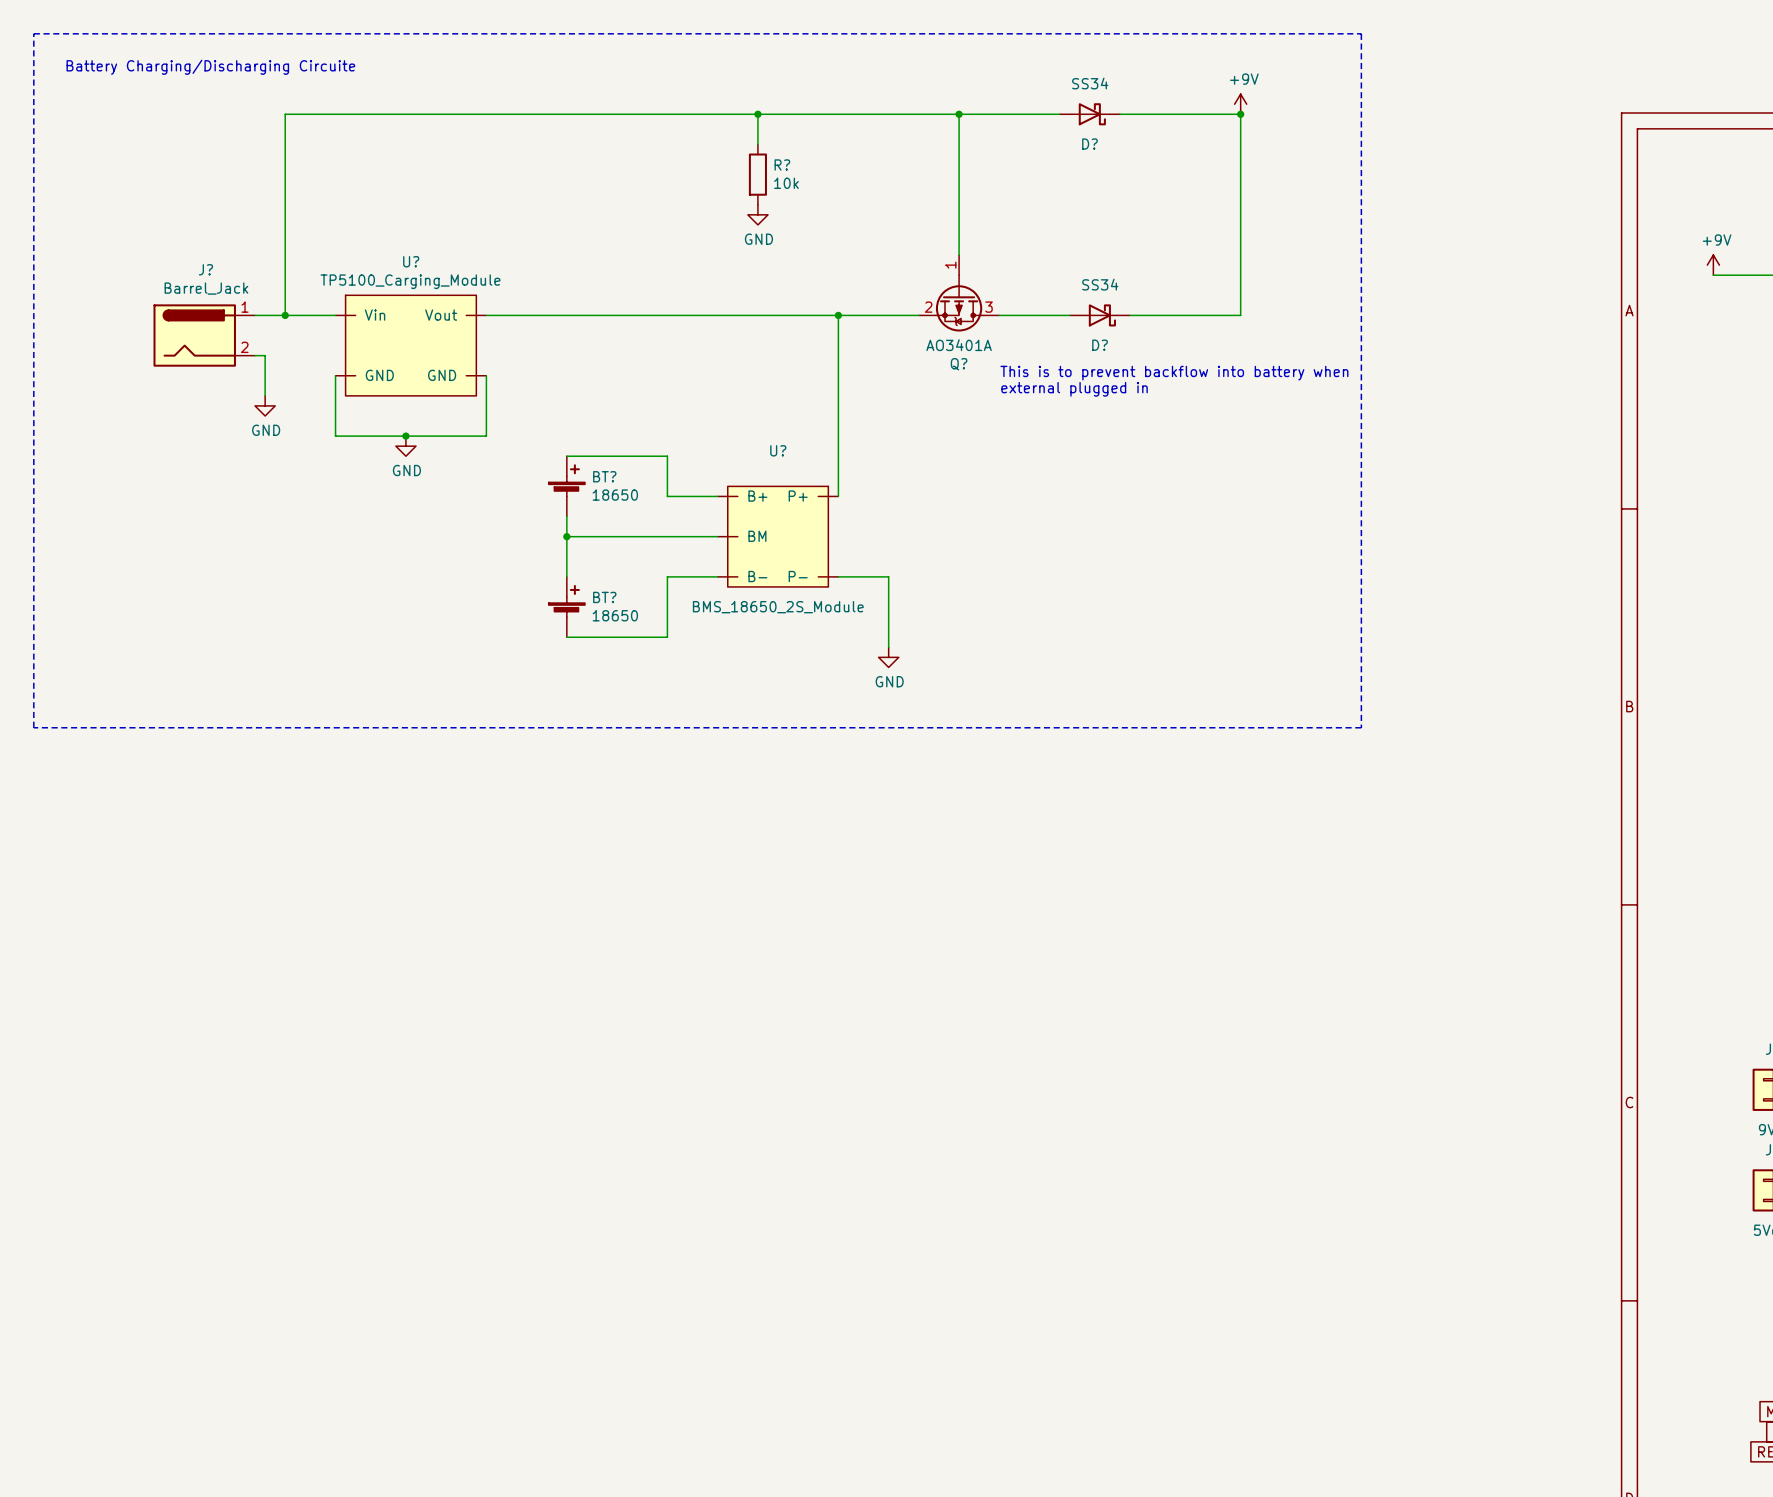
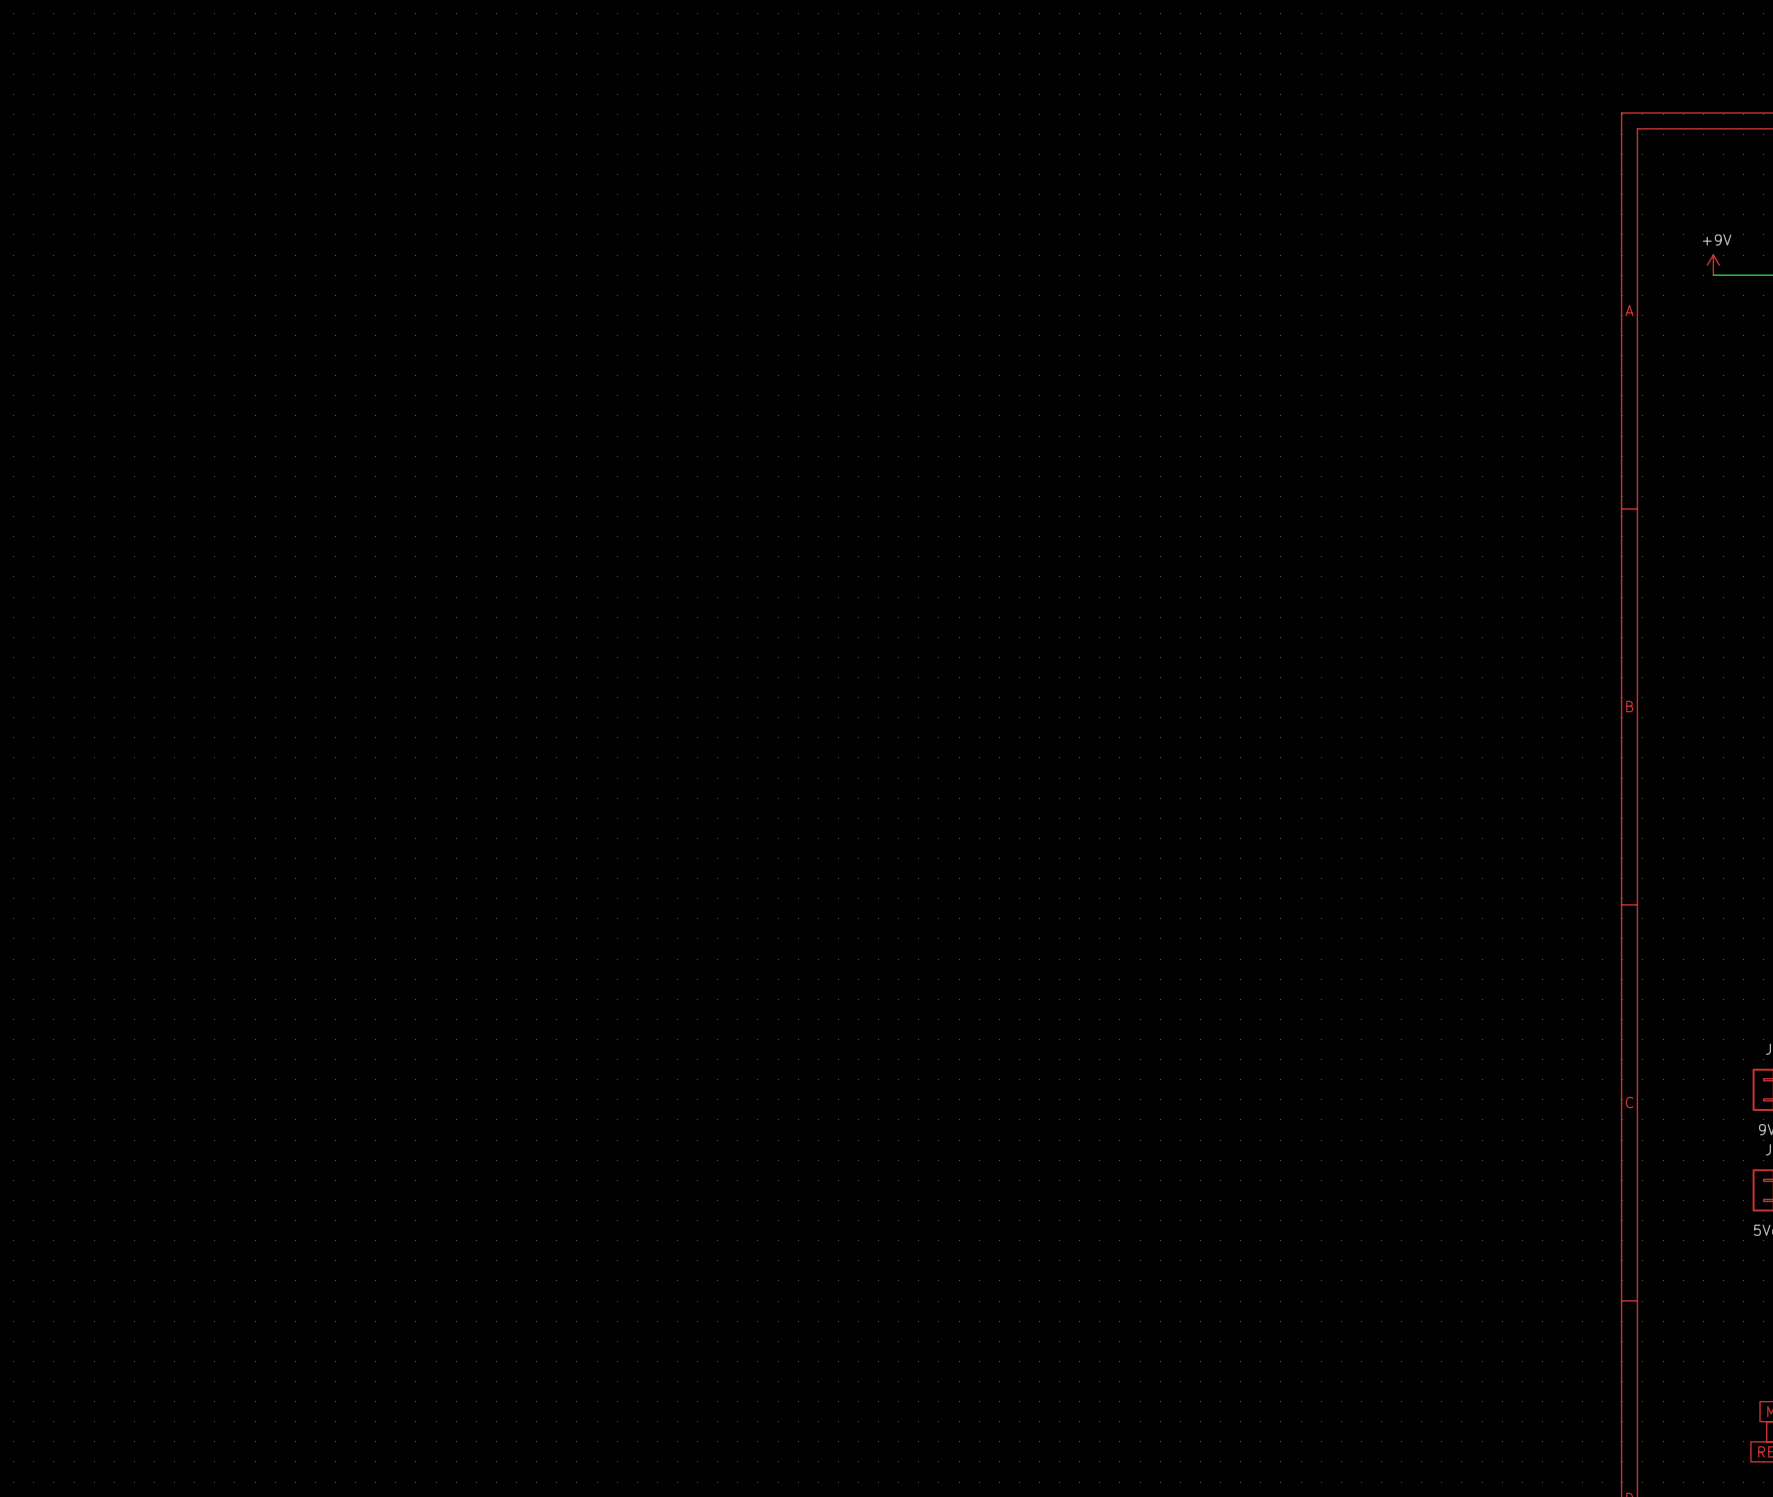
line: (33, 33) (33, 727) (1361, 727) (1361, 33) (33, 33) -> none
text: Battery Charging/Discharging Circuite (210, 67) -> none
power symbol: +9V (1240, 104) -> none
wire: (757, 114) (757, 144) -> none
junction: (757, 114) -> none
wire: (959, 114) (959, 255) -> none
junction: (959, 114) -> none
wire: (1059, 114) (285, 114) (285, 315) -> none
D?: SS34 (1089, 114) -> none
wire: (1119, 114) (1240, 114) (1240, 315) (1130, 315) -> none
junction: (1240, 114) -> none
R?: 10k (757, 174) -> none
power symbol: GND (757, 214) -> none
Q?: AO3401A (959, 293) -> none
wire: (255, 315) (335, 315) -> none
junction: (285, 315) -> none
wire: (486, 315) (918, 315) -> none
wire: (838, 315) (838, 496) -> none
junction: (838, 315) -> none
wire: (999, 315) (1069, 315) -> none
D?: SS34 (1099, 315) -> none
J?: Barrel_Jack (204, 335) -> none
U?: TP5100_Carging_Module (410, 345) -> none
wire: (255, 355) (265, 355) (265, 395) -> none
text: This is to prevent backflow into battery when (1174, 373) -> none
wire: (335, 375) (335, 436) (486, 436) (486, 375) -> none
text: external plugged in (1074, 389) -> none
power symbol: GND (265, 405) -> none
junction: (405, 436) -> none
power symbol: GND (405, 446) -> none
wire: (566, 456) (667, 456) (667, 496) (717, 496) -> none
BT?: 18650 (566, 486) -> none
wire: (566, 516) (566, 576) -> none
wire: (566, 536) (717, 536) -> none
junction: (566, 536) -> none
U?: BMS_18650_2S_Module (778, 536) -> none
wire: (717, 576) (667, 576) (667, 637) (566, 637) -> none
wire: (838, 576) (888, 576) (888, 647) -> none
BT?: 18650 (566, 607) -> none
power symbol: GND (888, 657) -> none

